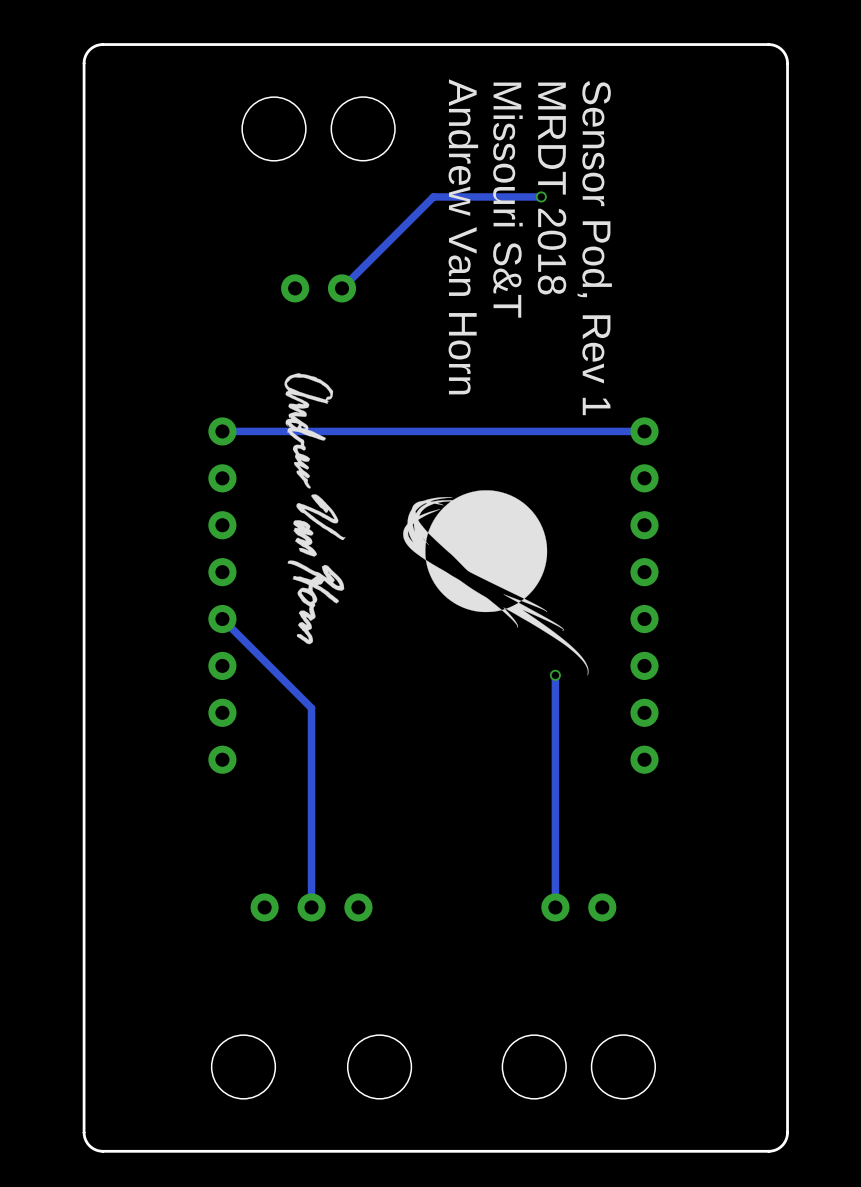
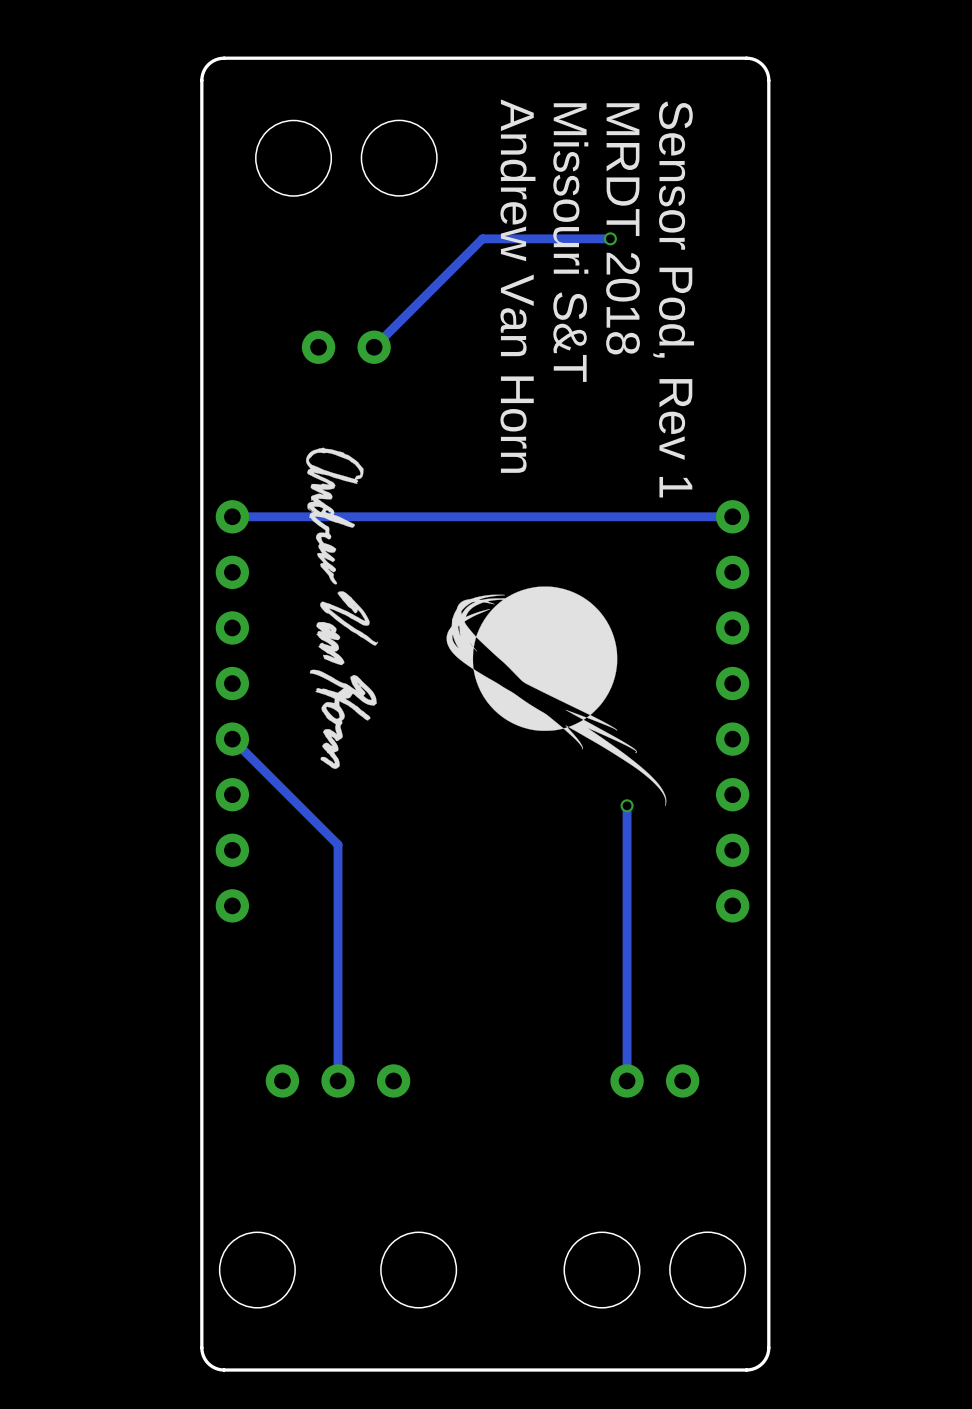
board edge: (215, 44) (100, 44) (89, 50) (84, 63) (84, 1135) (89, 1145) (100, 1151) (215, 1151) -> (224, 58) (215, 59) (208, 64) (203, 71) (201, 80) (201, 1347) (203, 1356) (208, 1363) (215, 1368) (224, 1370)
board edge: (656, 44) (771, 44) (783, 51) (787, 63) (787, 1135) (782, 1145) (771, 1151) (656, 1151) -> (746, 58) (755, 59) (762, 64) (767, 71) (768, 80) (768, 1347) (767, 1356) (762, 1363) (755, 1368) (746, 1370)

